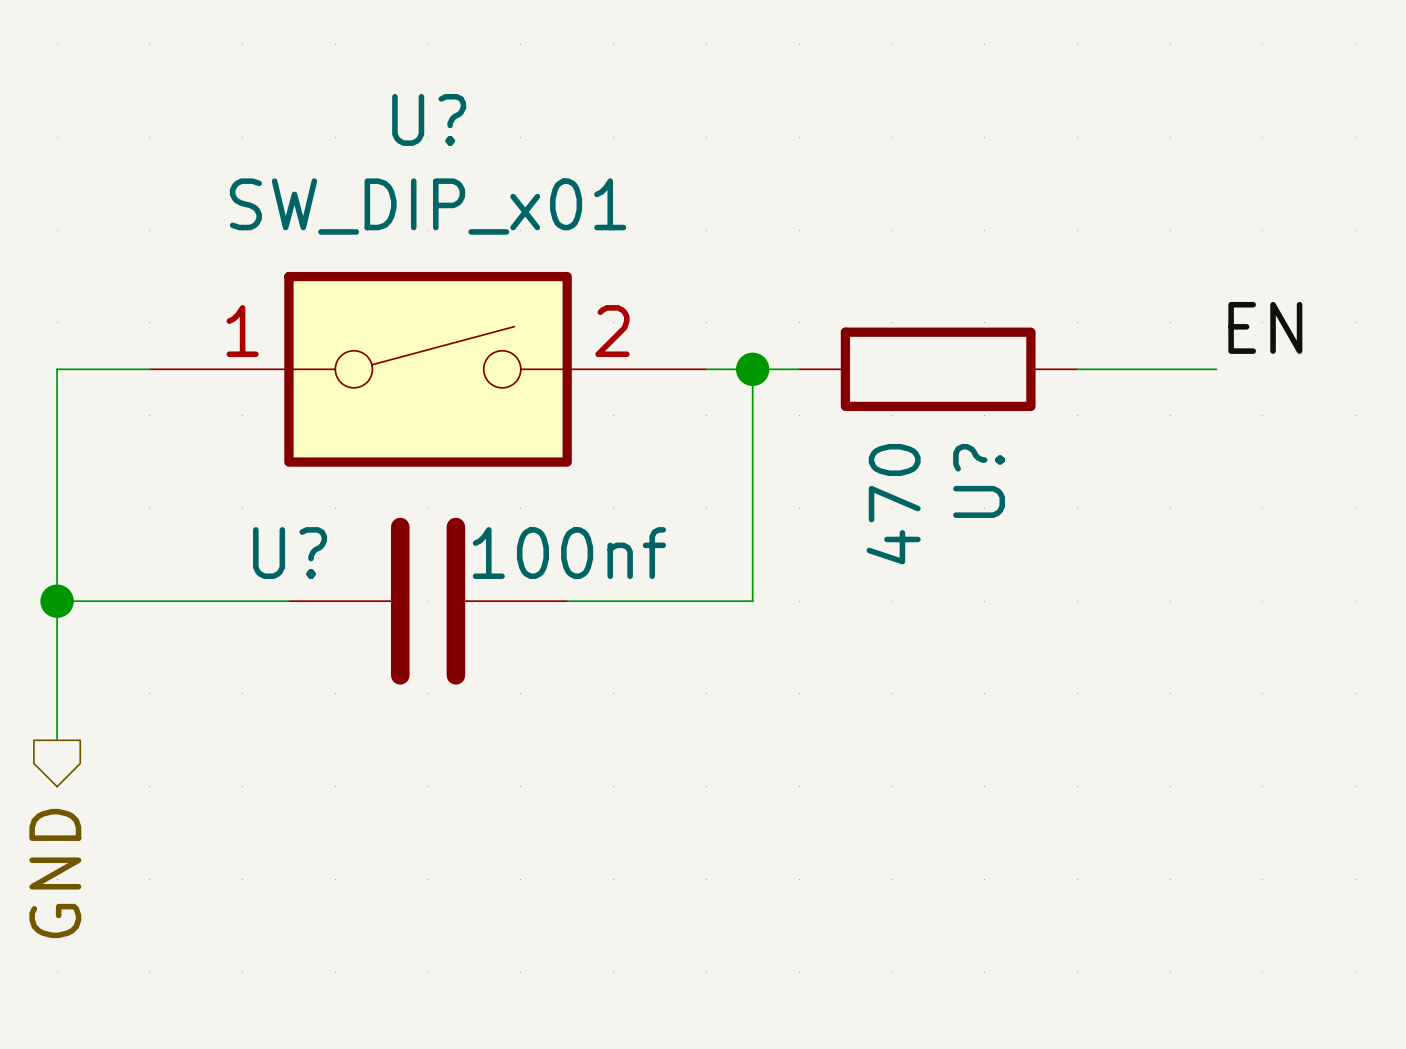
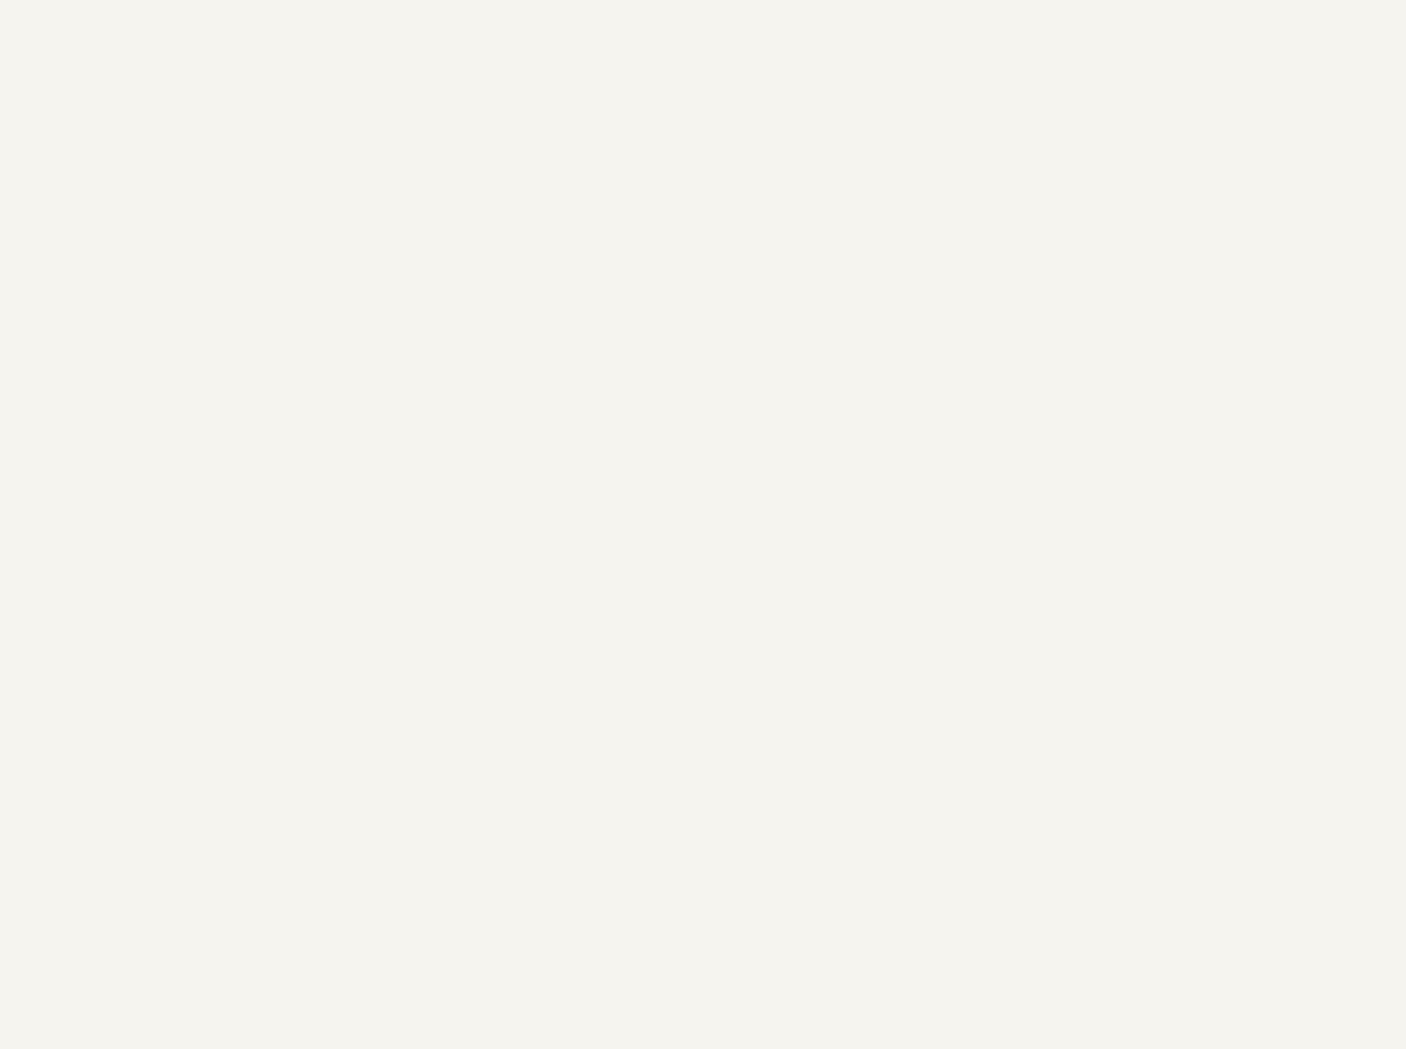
label: EN (1265, 327) -> none
wire: (149, 369) (57, 369) (57, 740) -> none
U?: SW_DIP_x01 (428, 369) -> none
wire: (706, 369) (799, 369) -> none
wire: (752, 369) (752, 601) (567, 601) -> none
junction: (752, 369) -> none
U?: 470 (938, 369) -> none
wire: (1077, 369) (1216, 369) -> none
wire: (57, 601) (288, 601) -> none
junction: (57, 601) -> none
U?: 100nf (428, 601) -> none
hierarchical label: GND (55, 873) -> none

